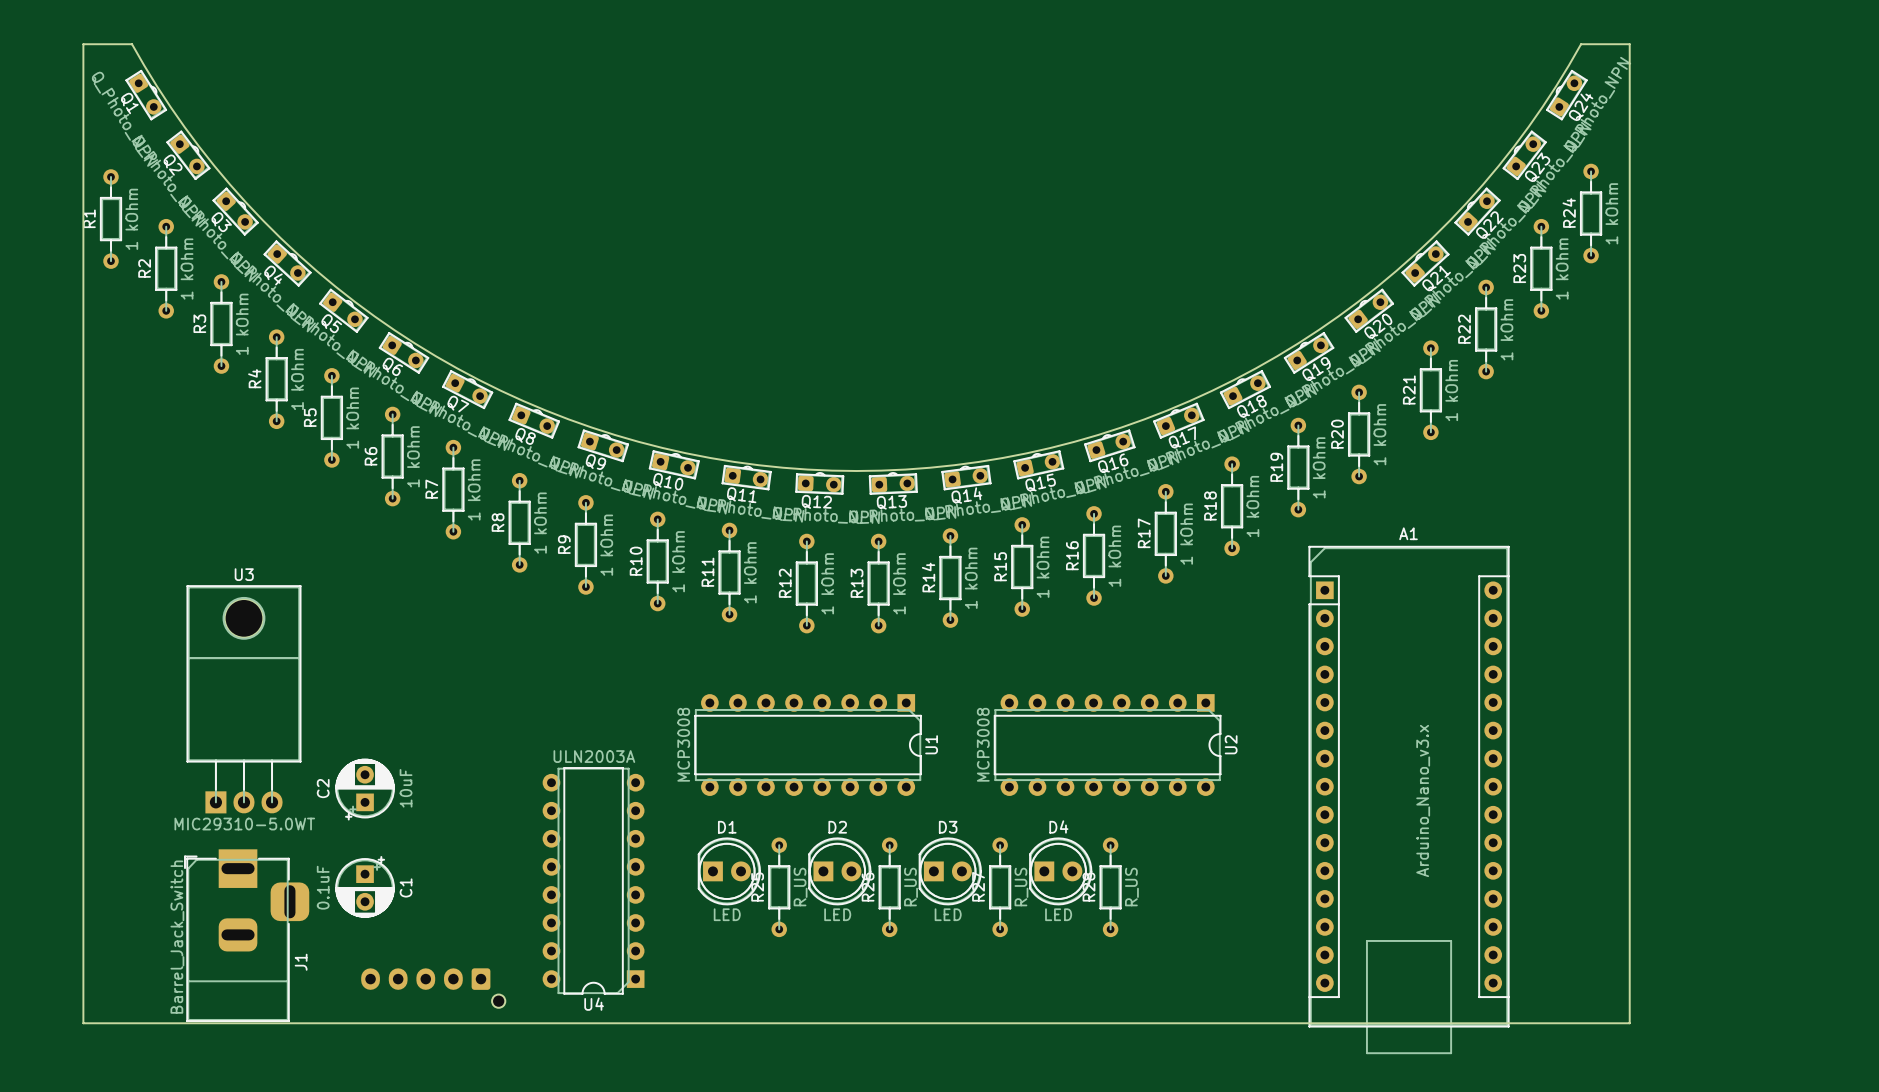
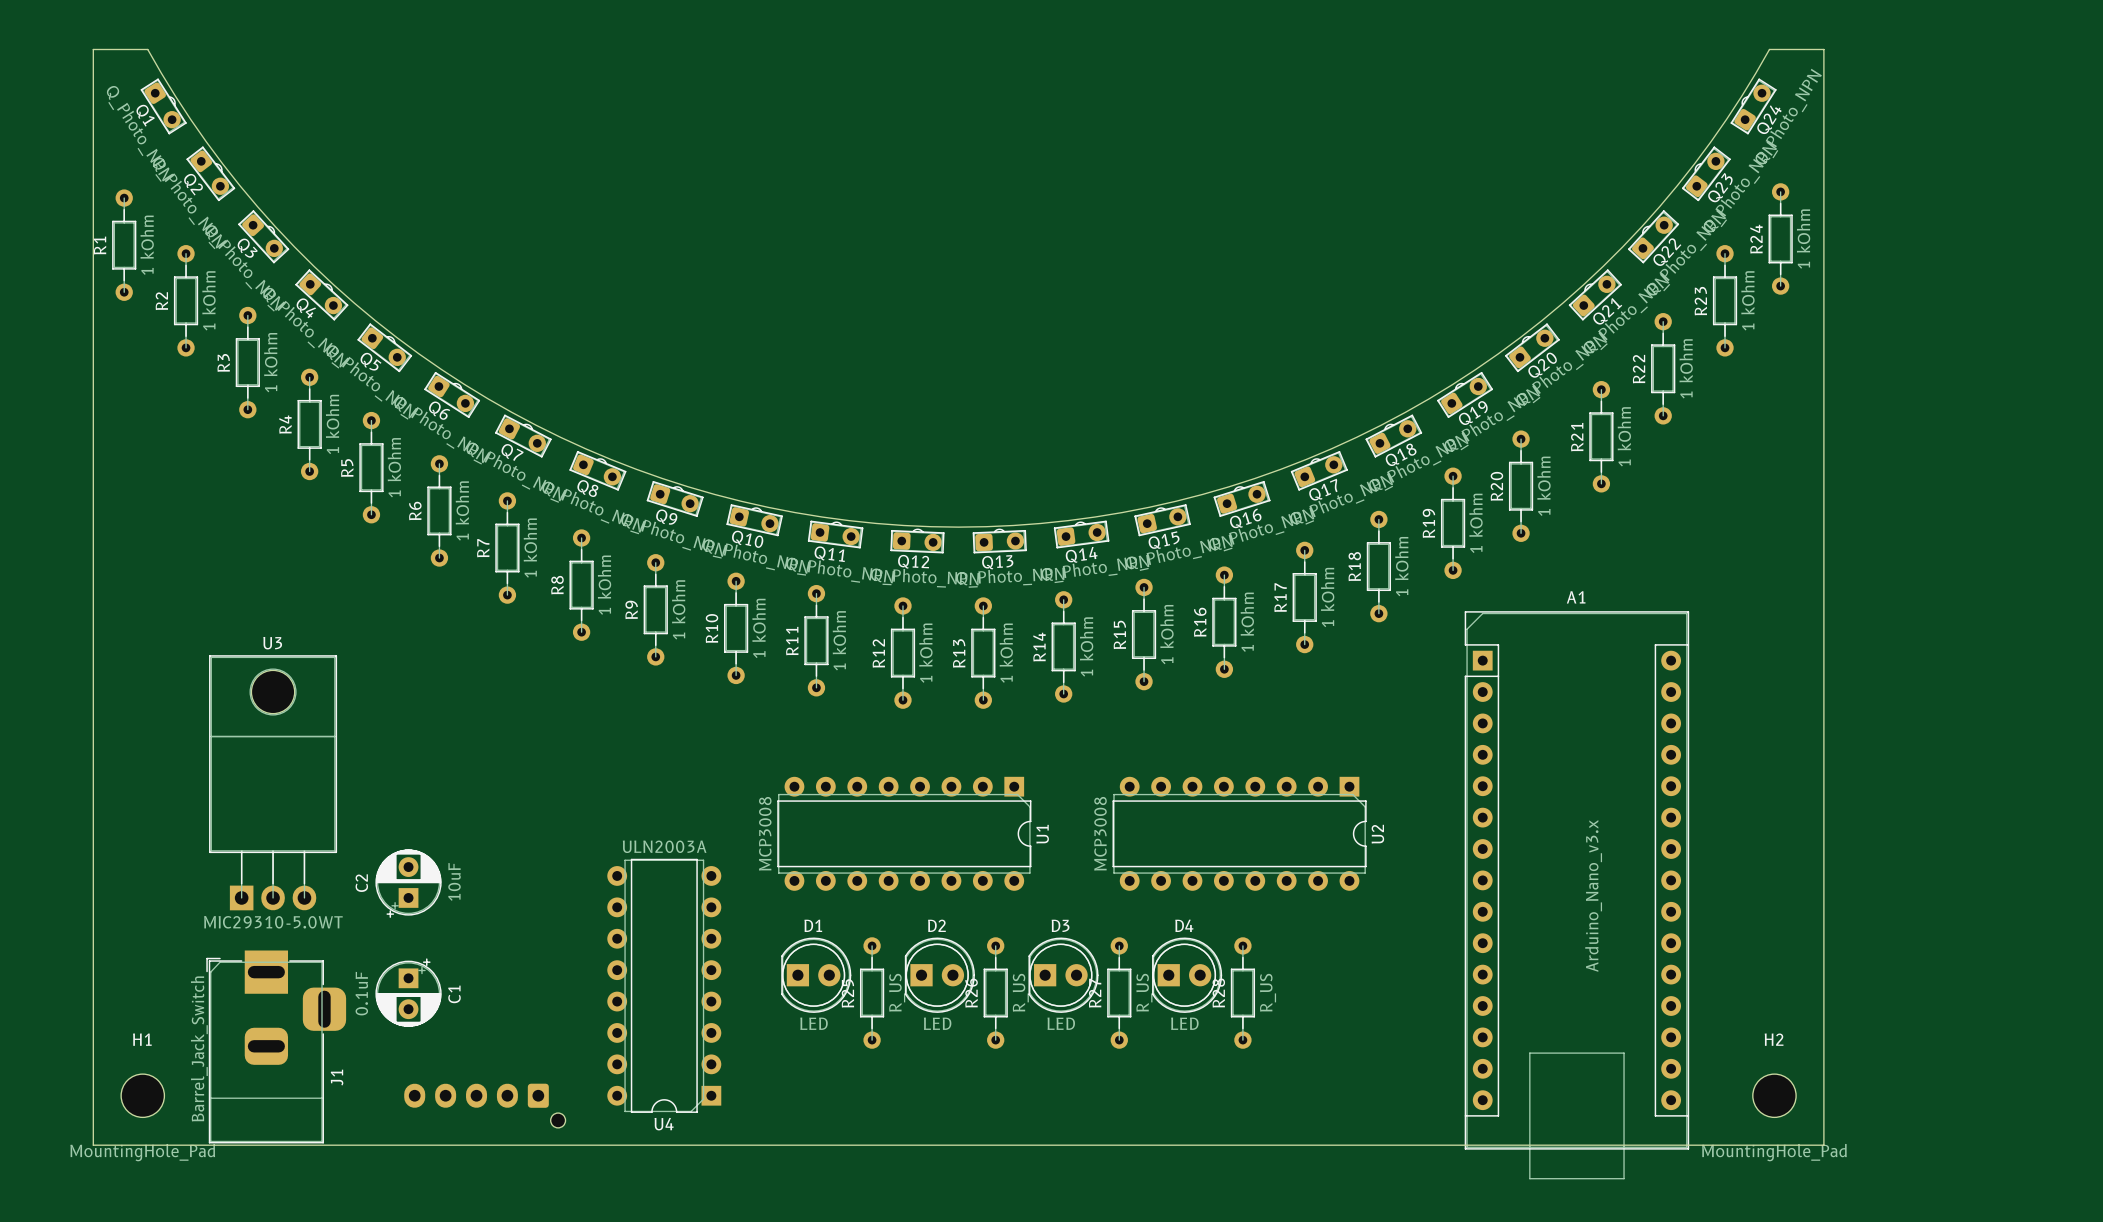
H1: none -> MountingHole_Pad (142, 1095)
H2: none -> MountingHole_Pad (1774, 1095)

